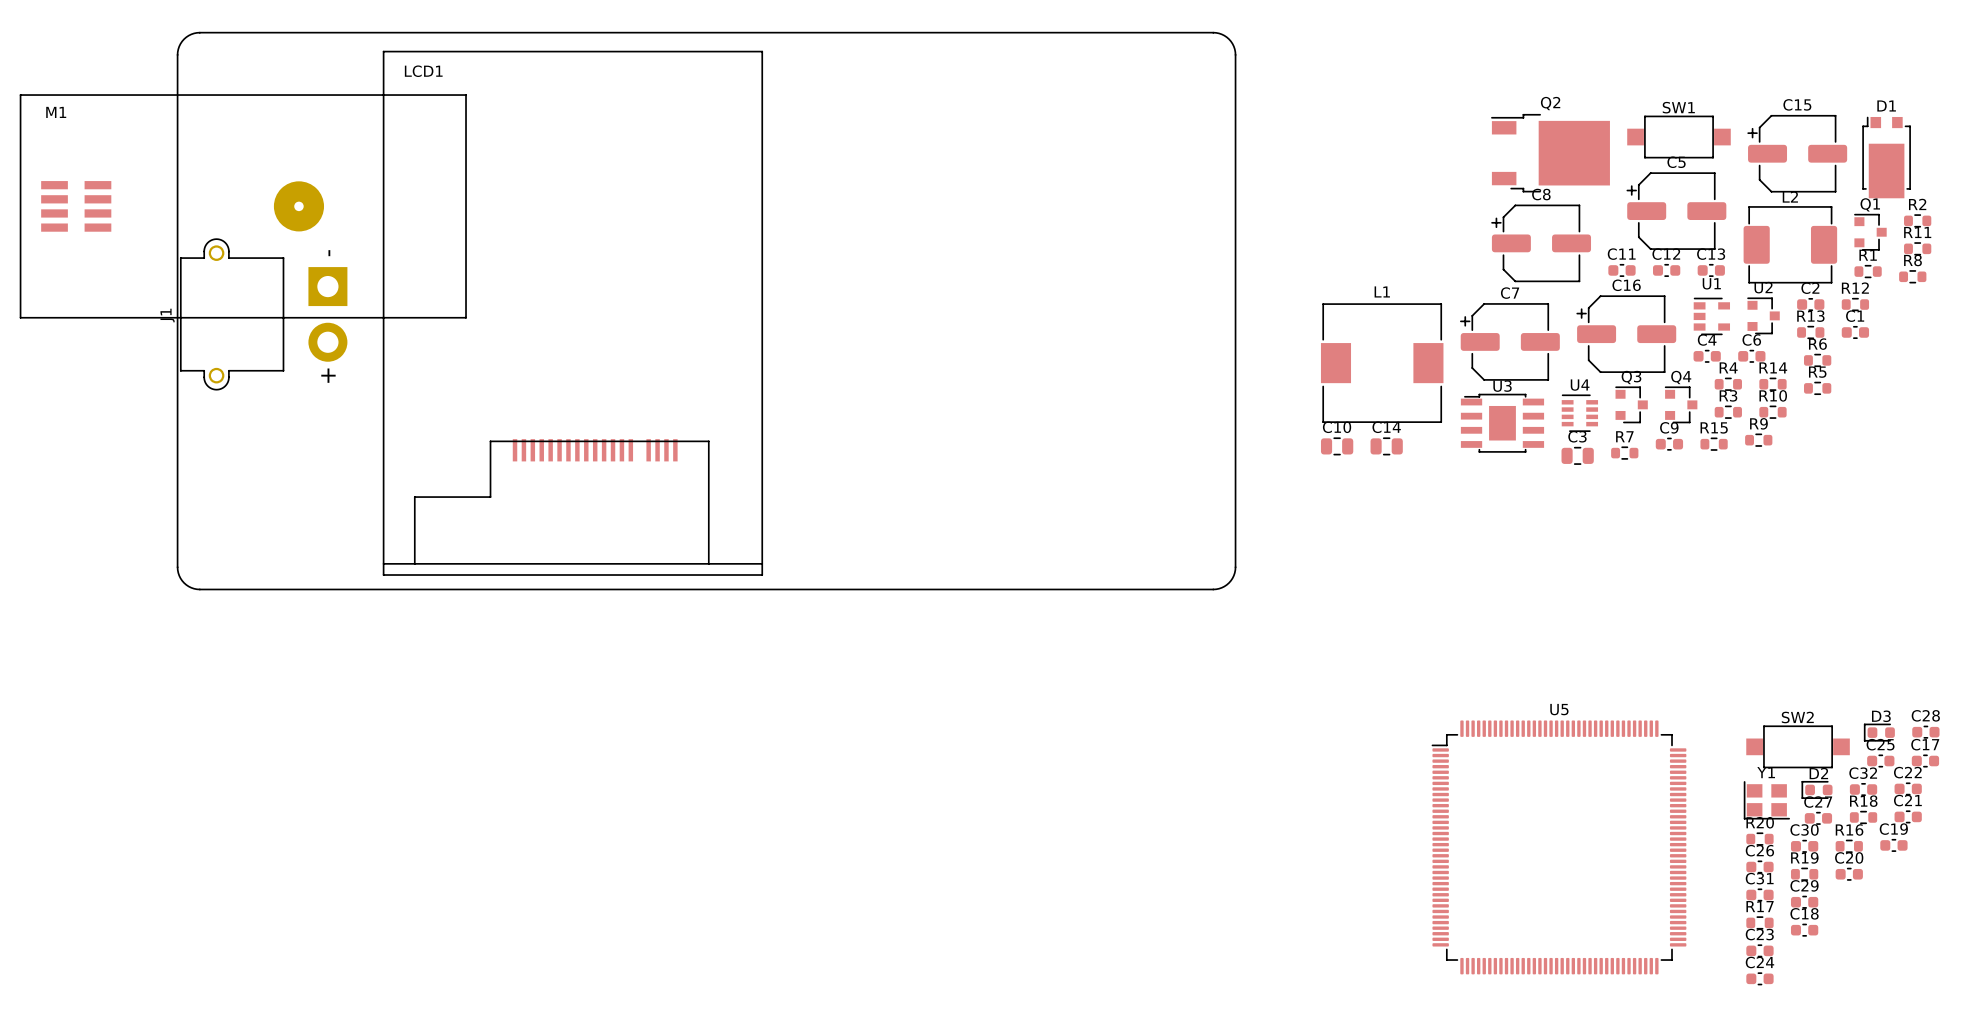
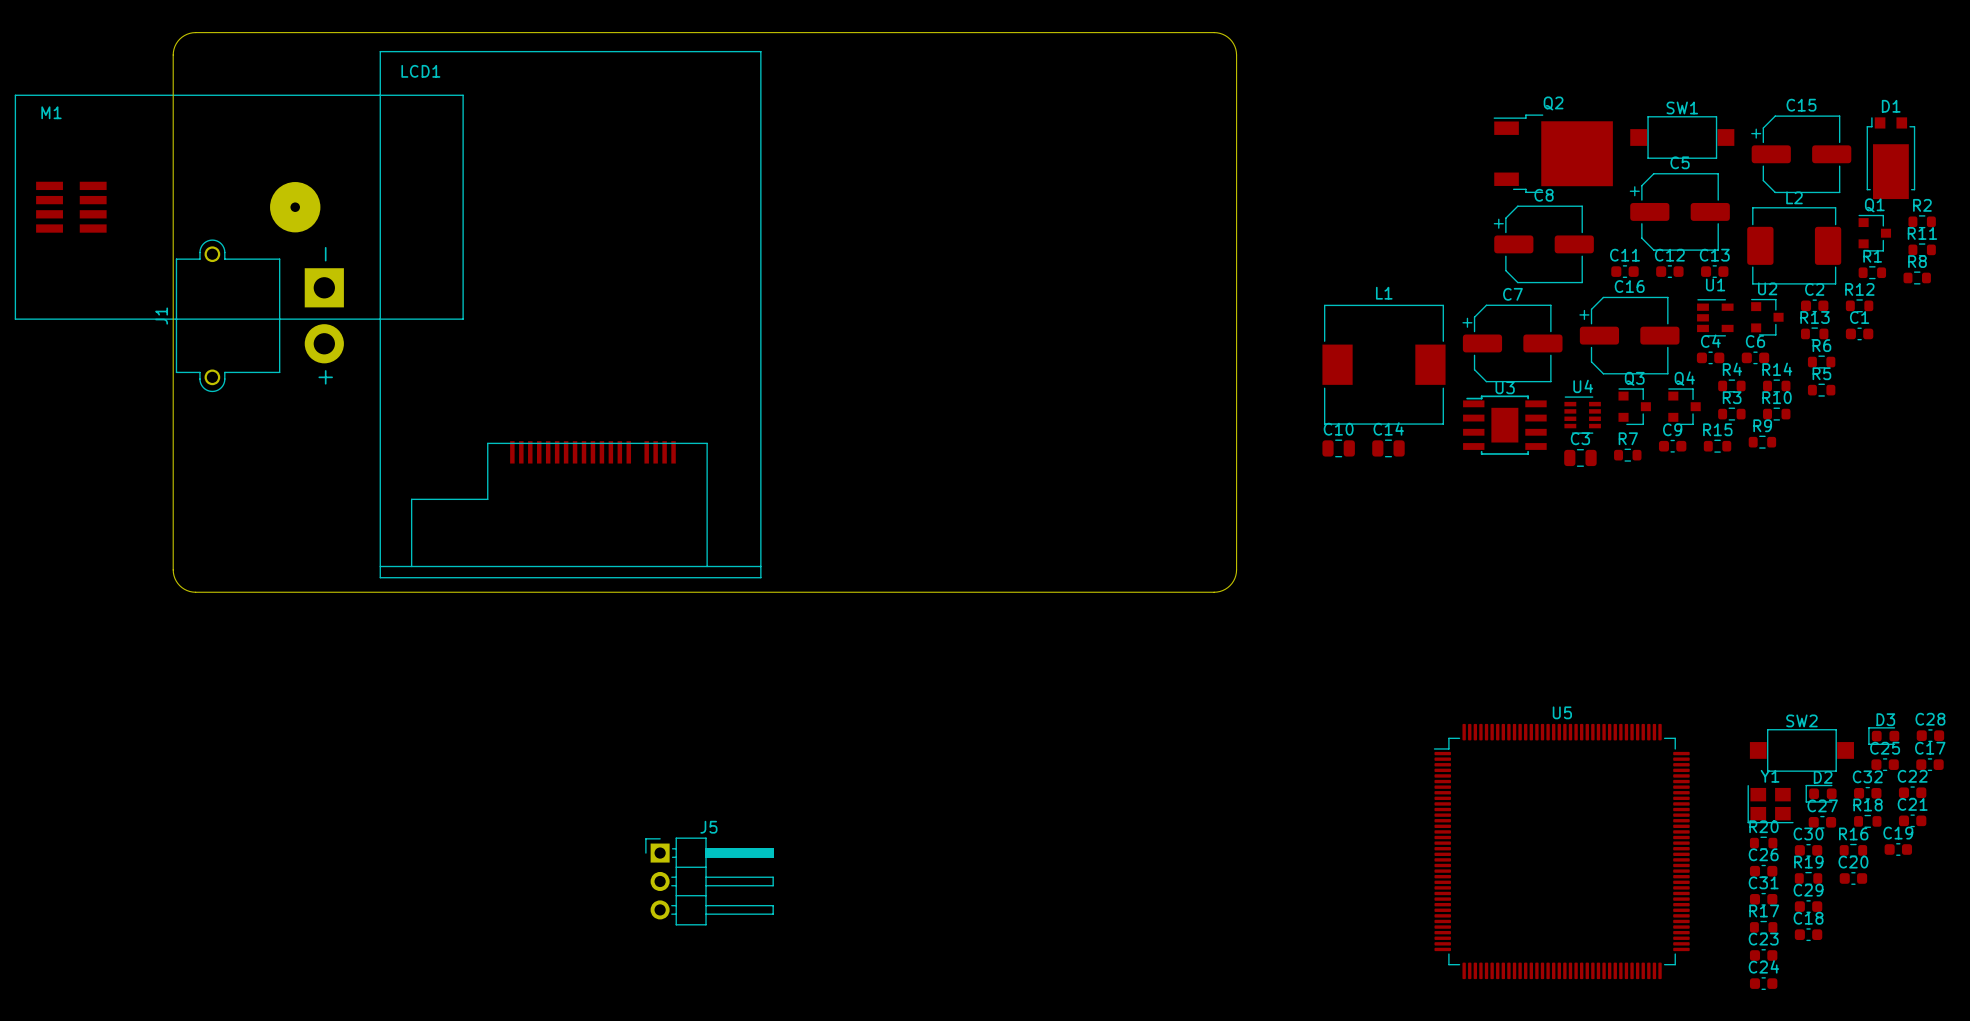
J5: none -> (709, 881)

